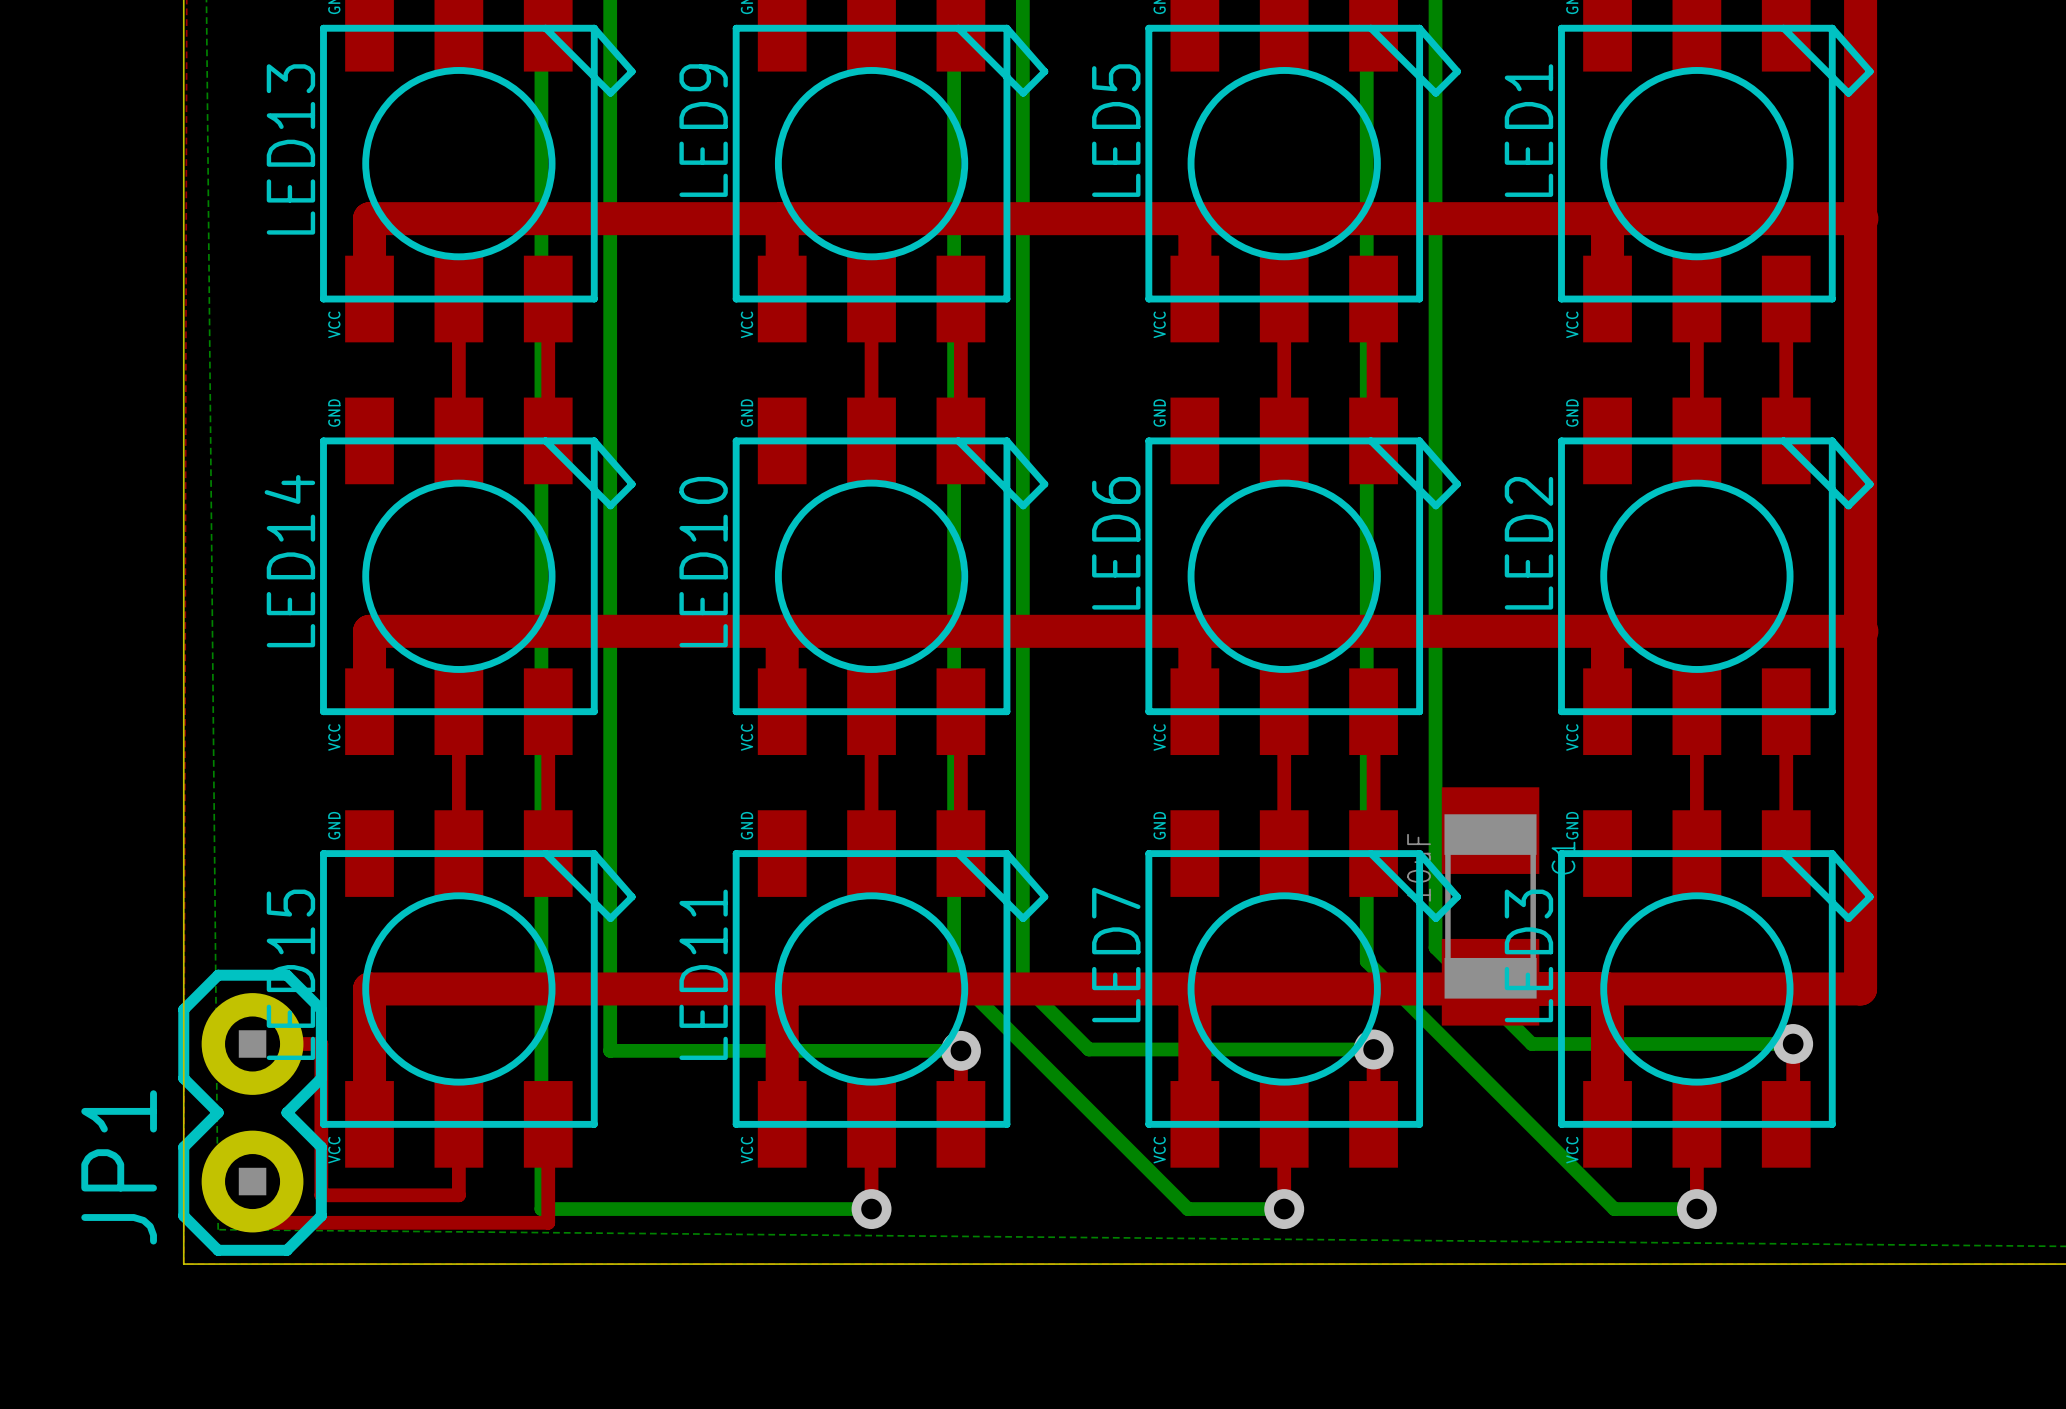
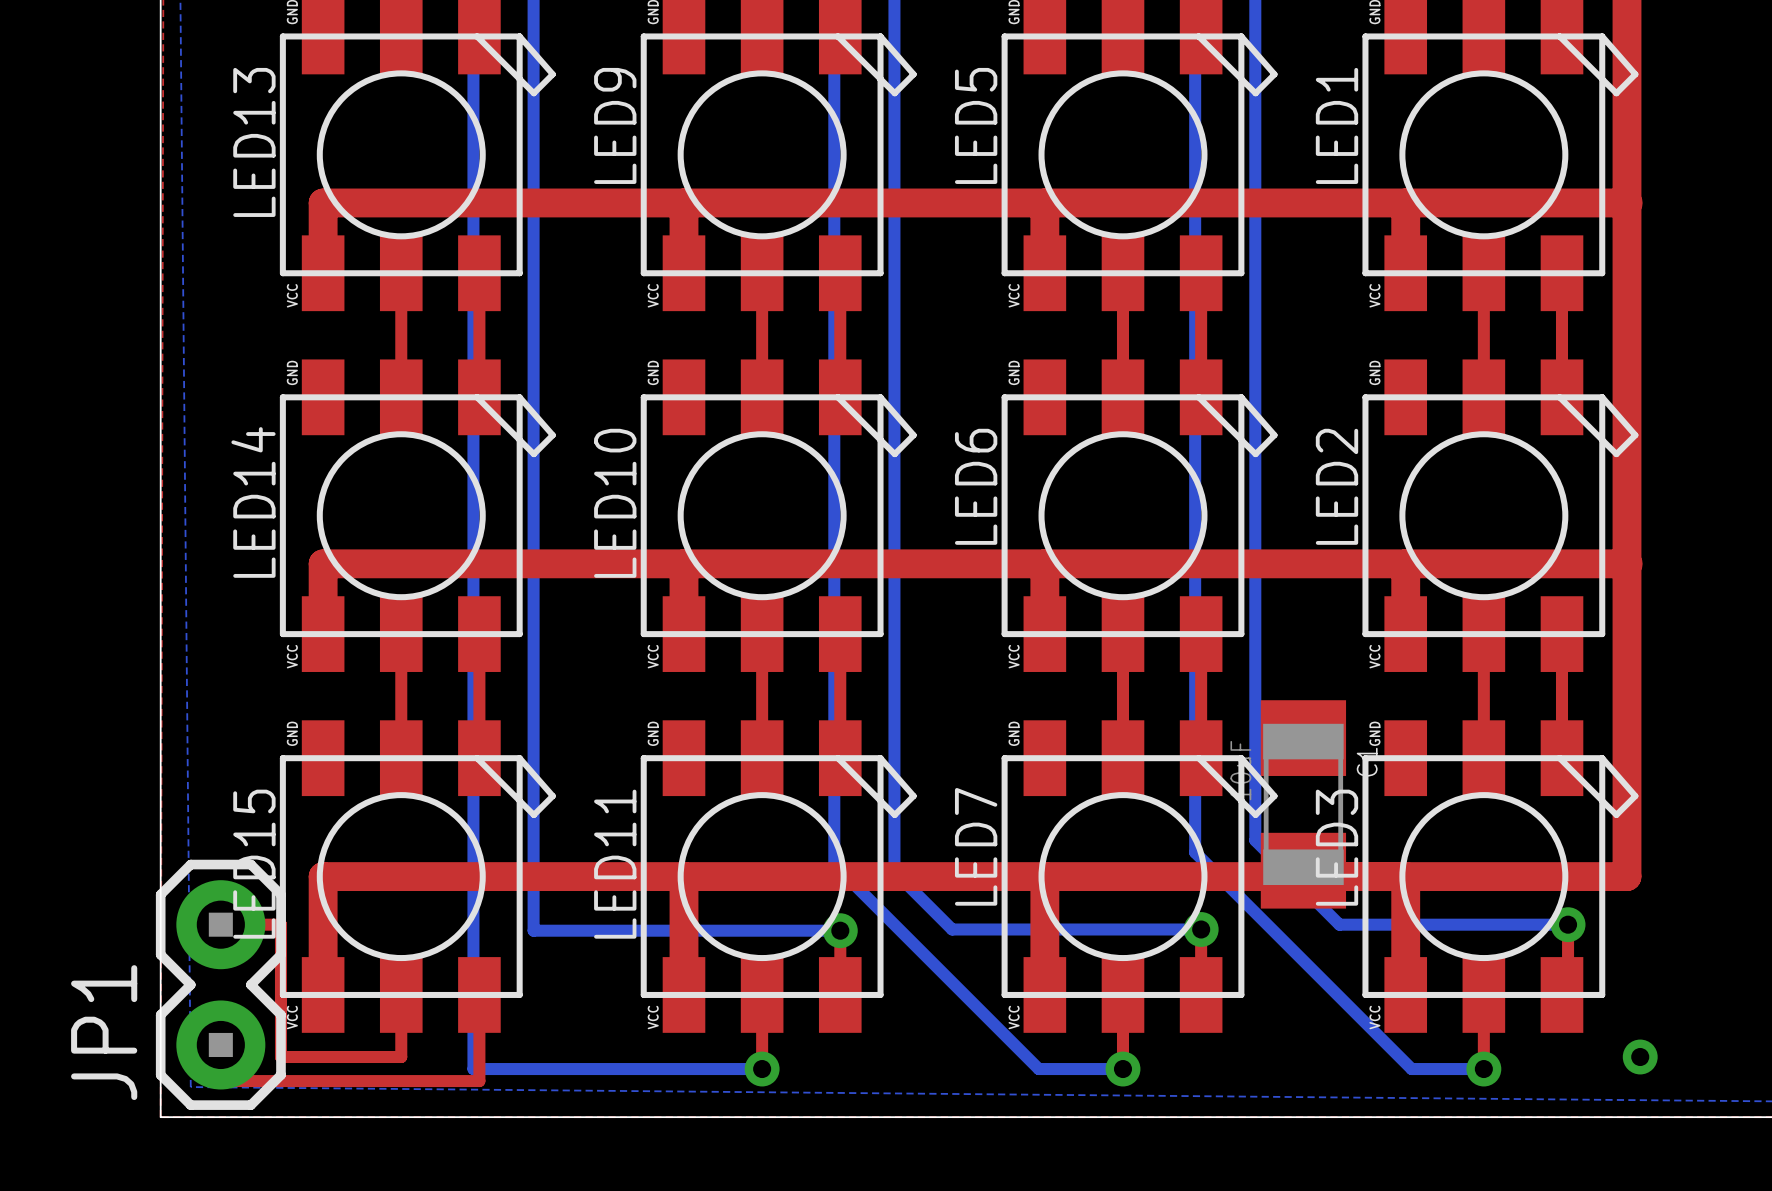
via: none -> (1640, 1057)

